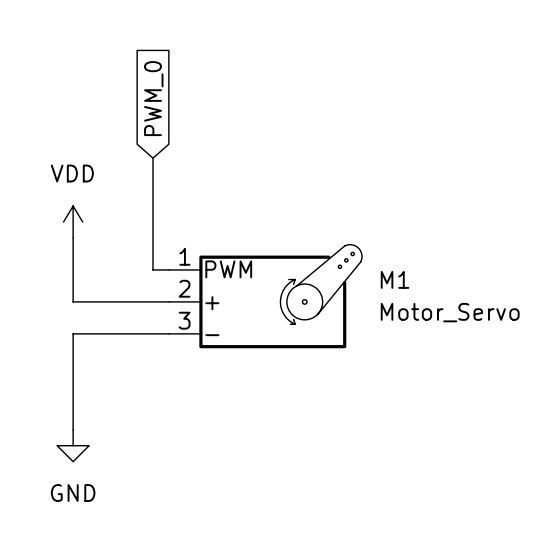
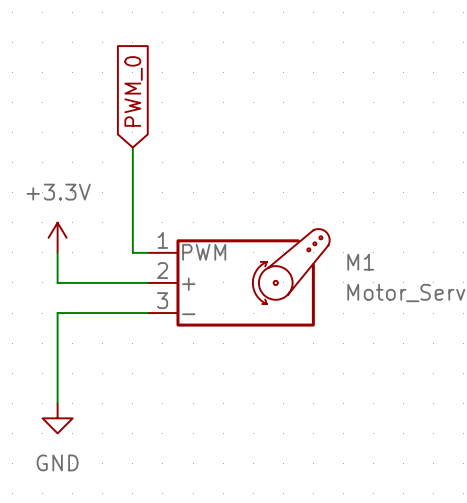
power symbol: VDD (73, 222) -> none
power symbol: none -> +3.3V (57, 237)

